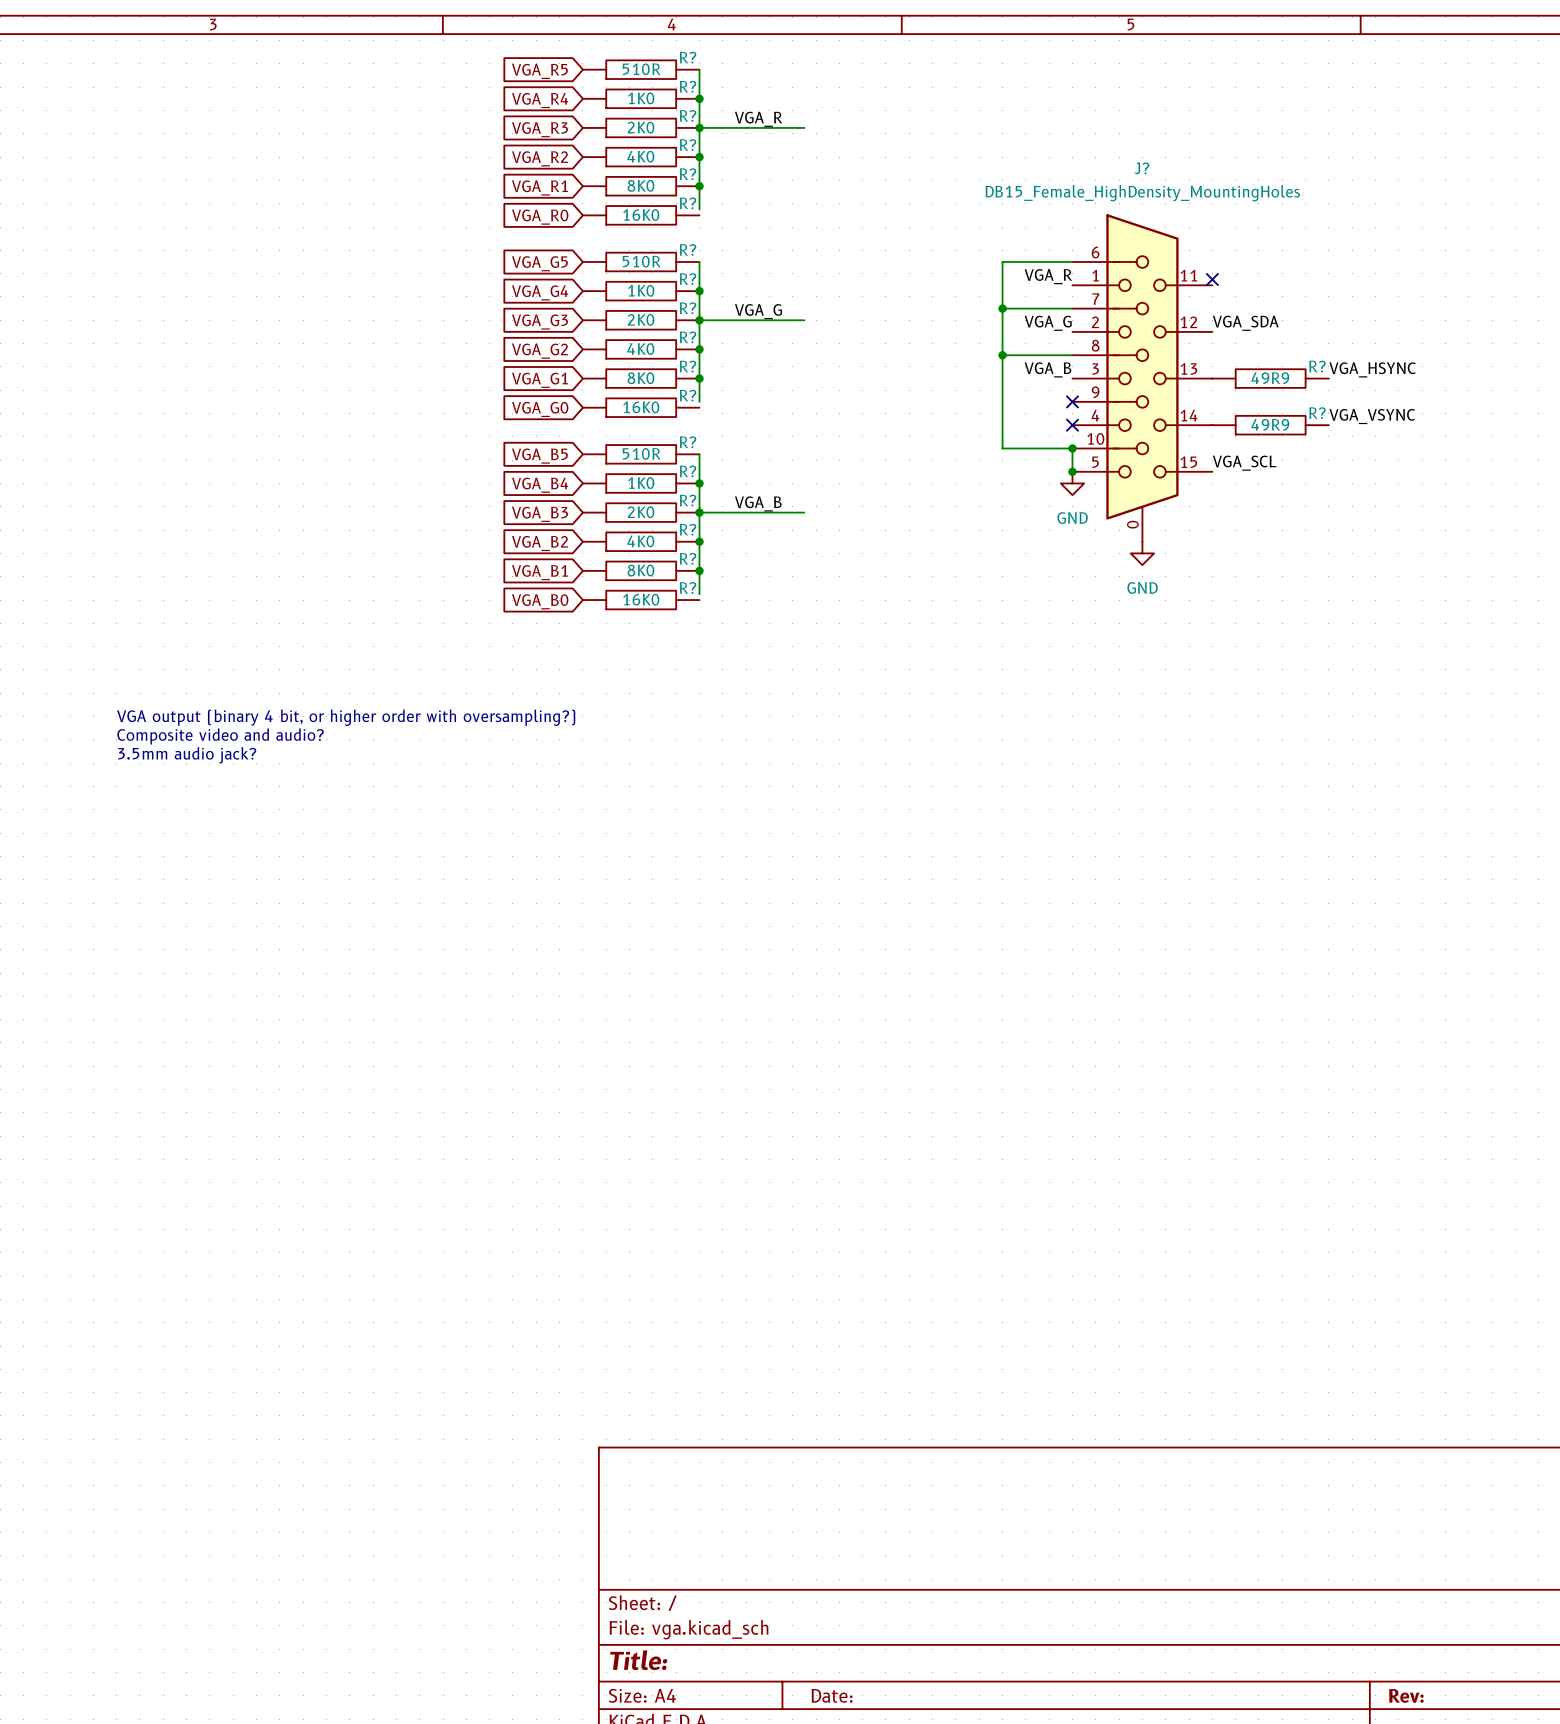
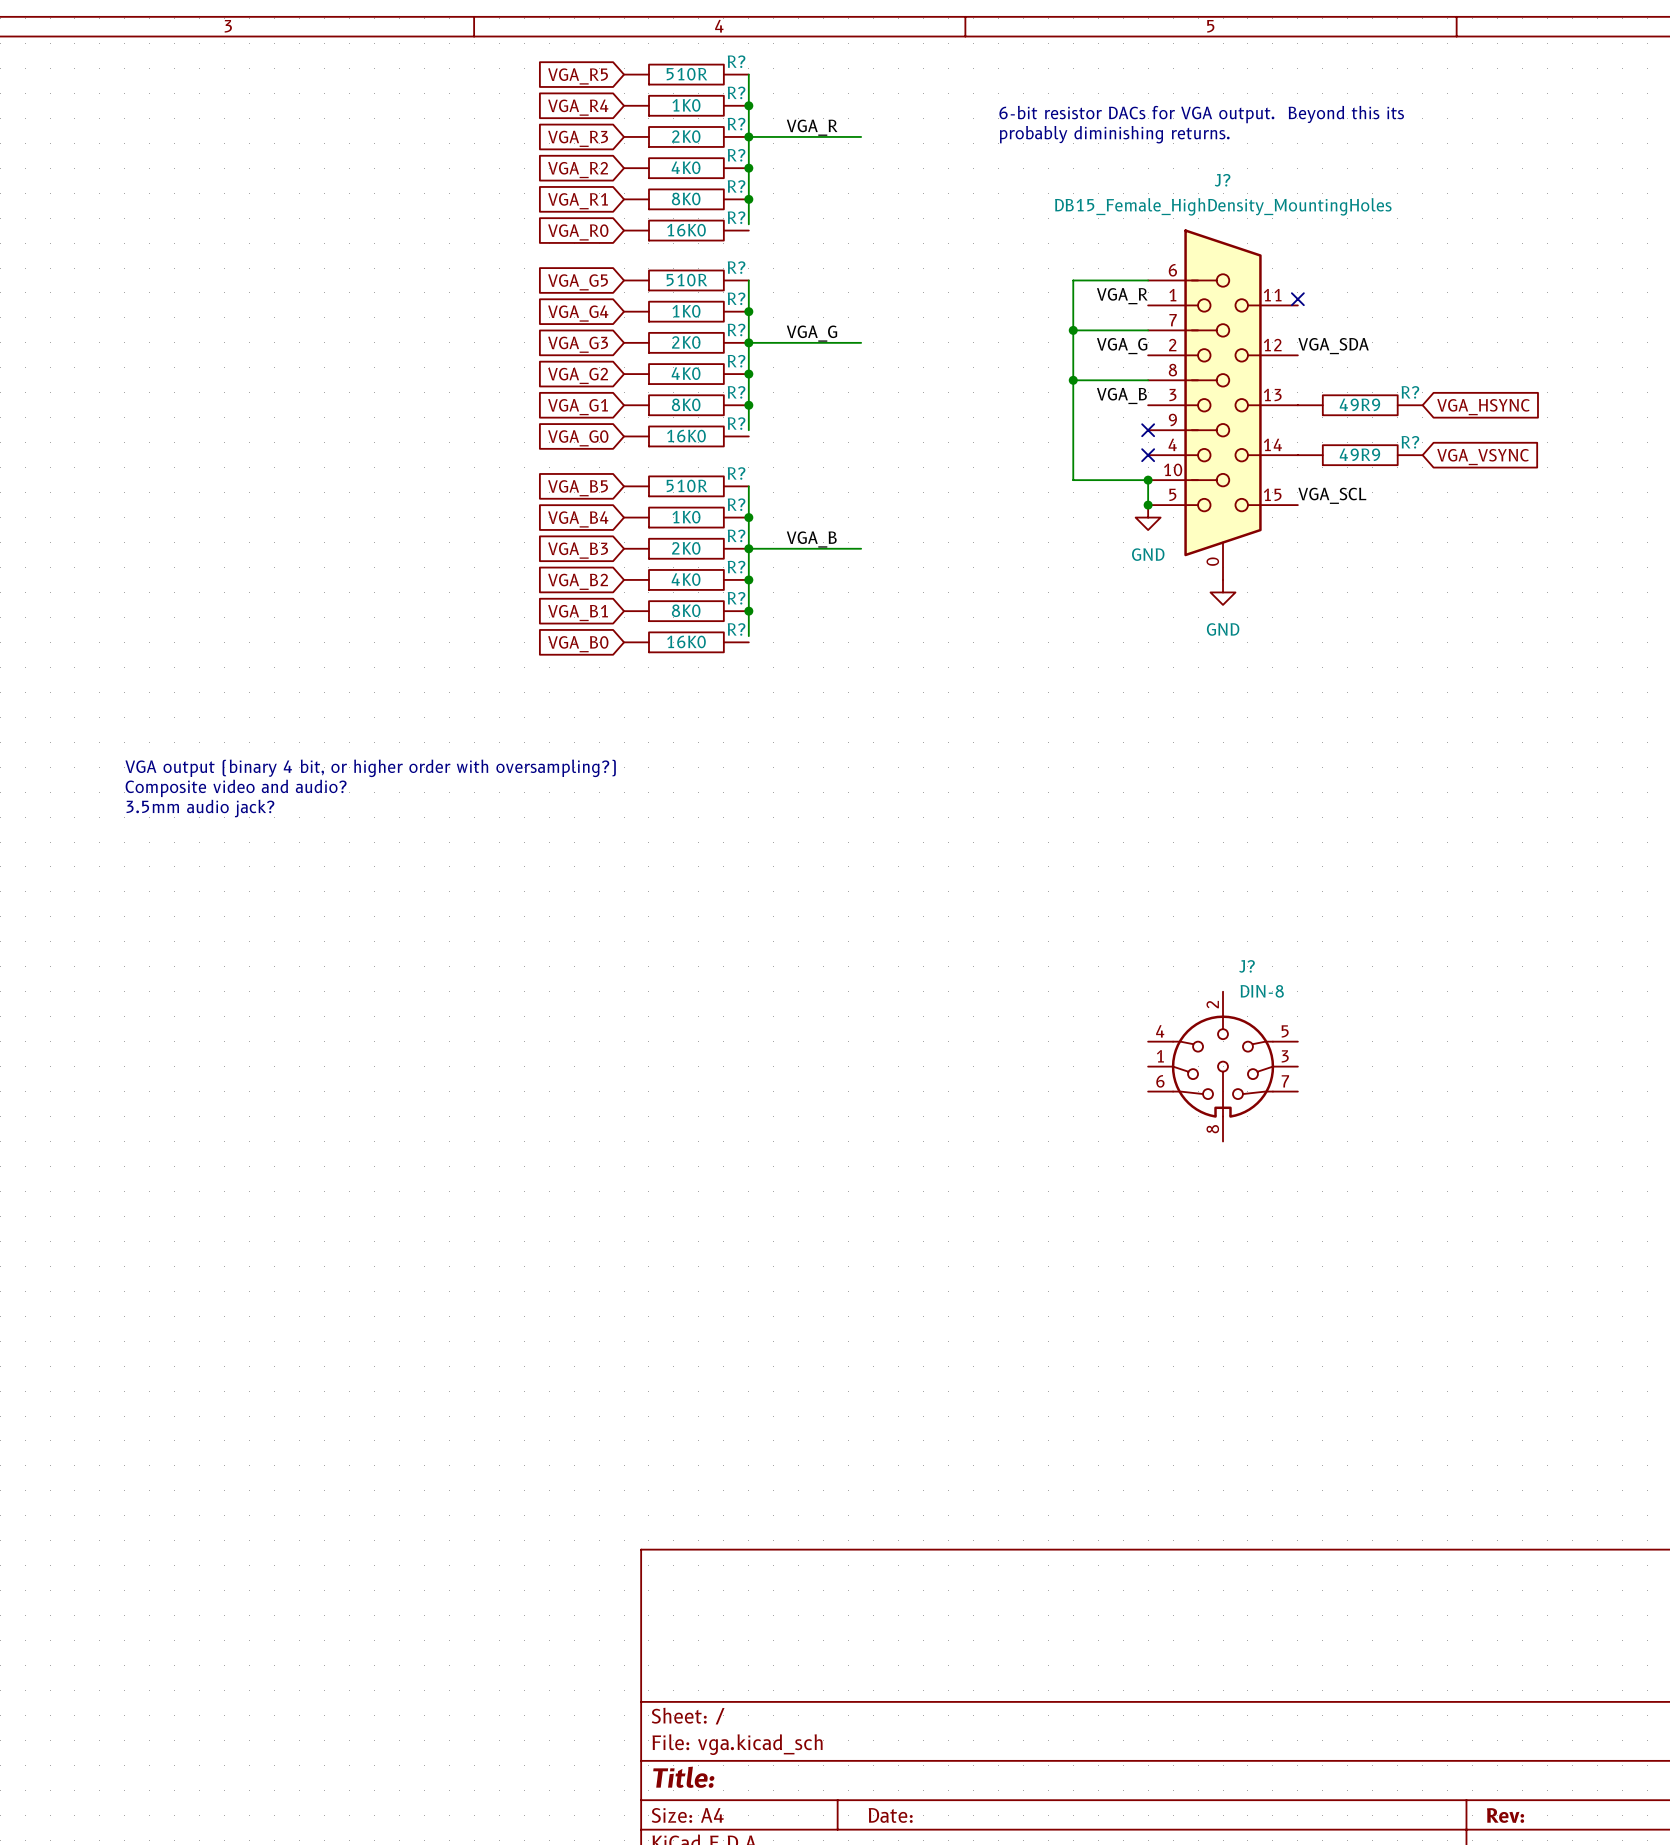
text: none -> 6-bit resistor DACs for VGA output. Beyond this its (1201, 114)
text: none -> probably diminishing returns. (1114, 134)
label: VGA_HSYNC (1372, 369) -> none
global label: none -> VGA_HSYNC (1483, 407)
label: VGA_VSYNC (1372, 416) -> none
global label: none -> VGA_VSYNC (1483, 457)
J?: none -> DIN-8 (1223, 1066)

